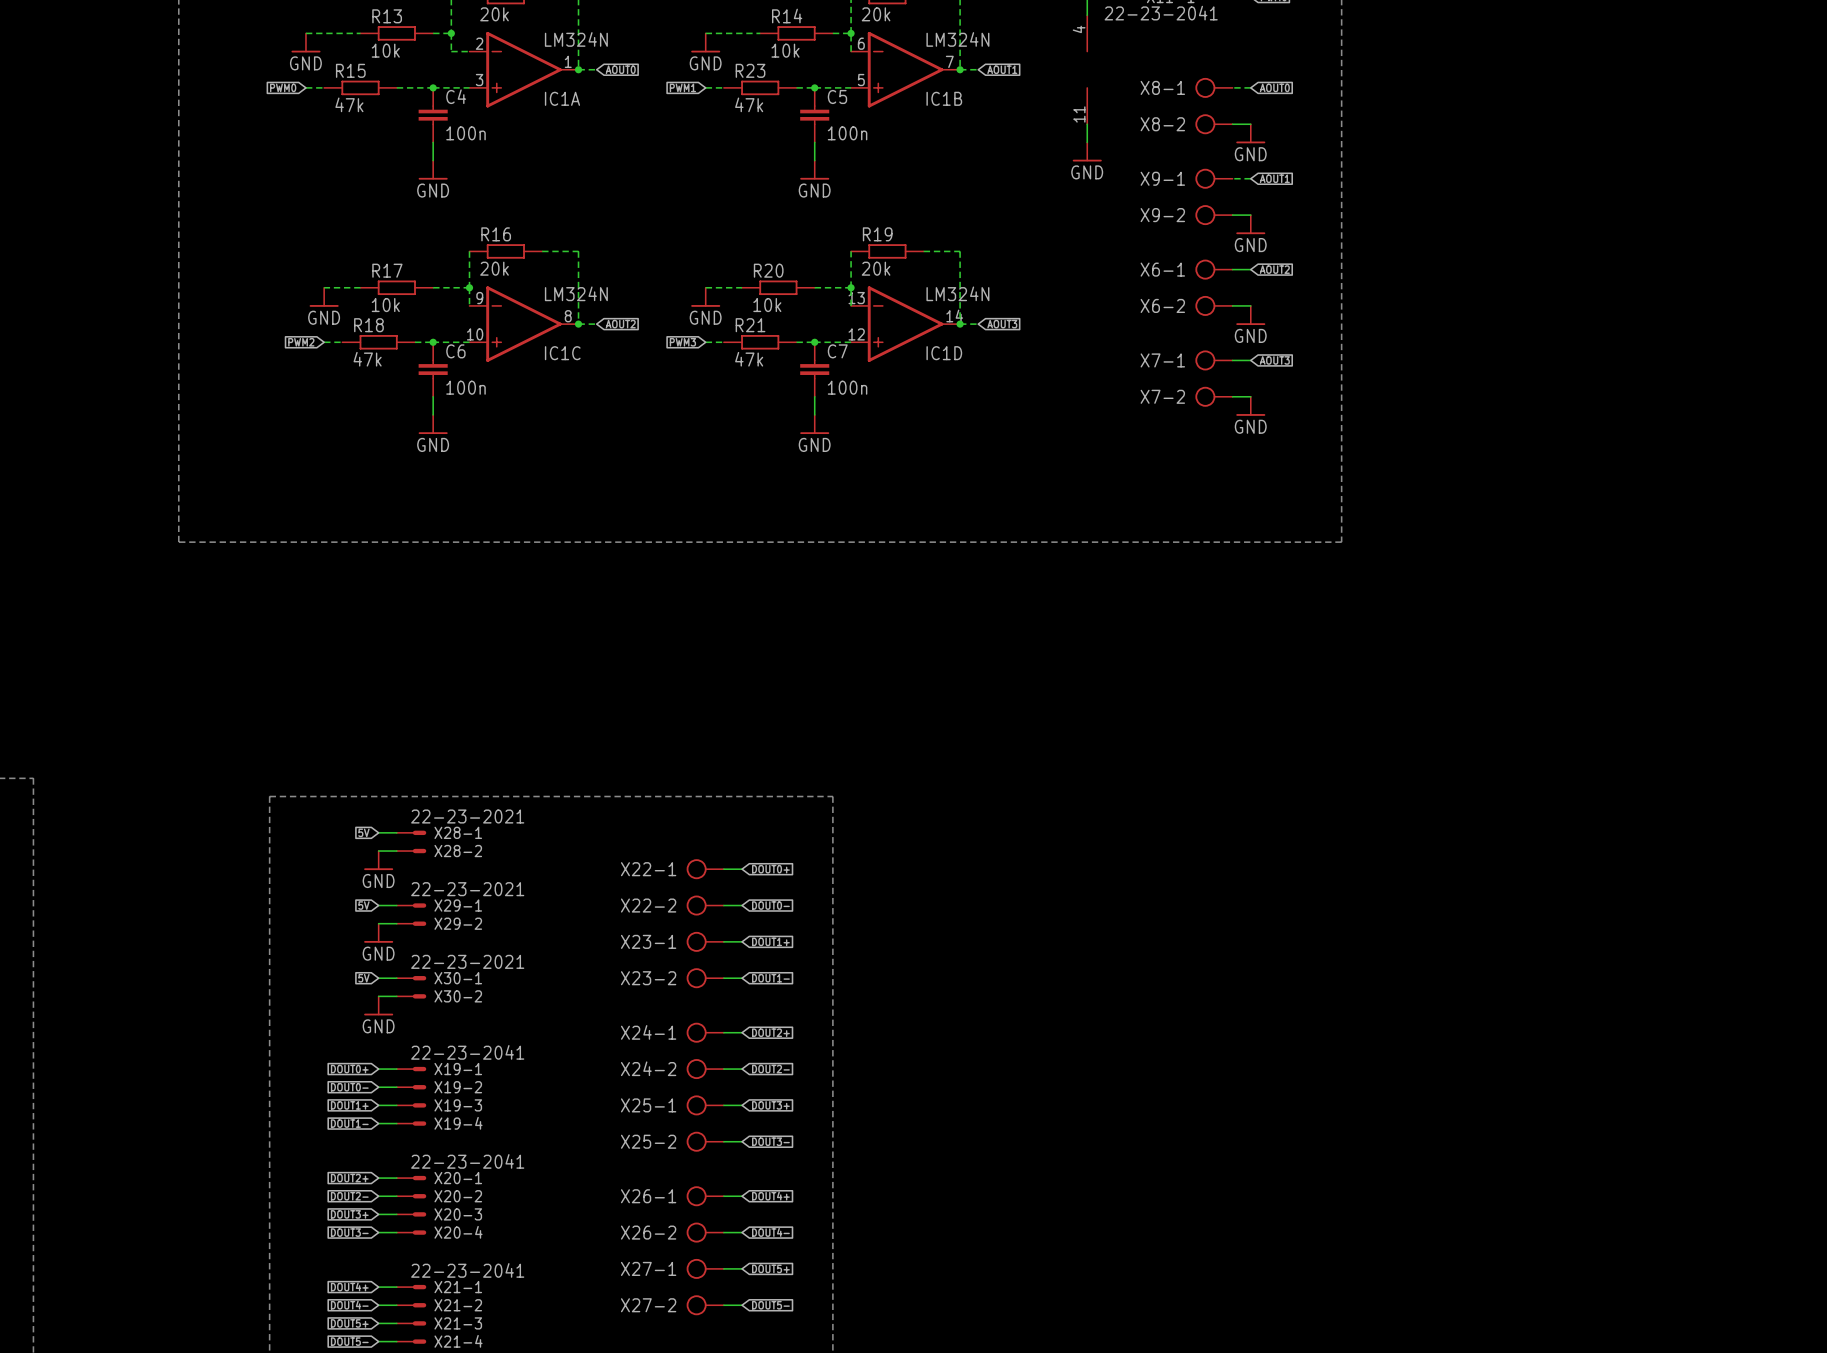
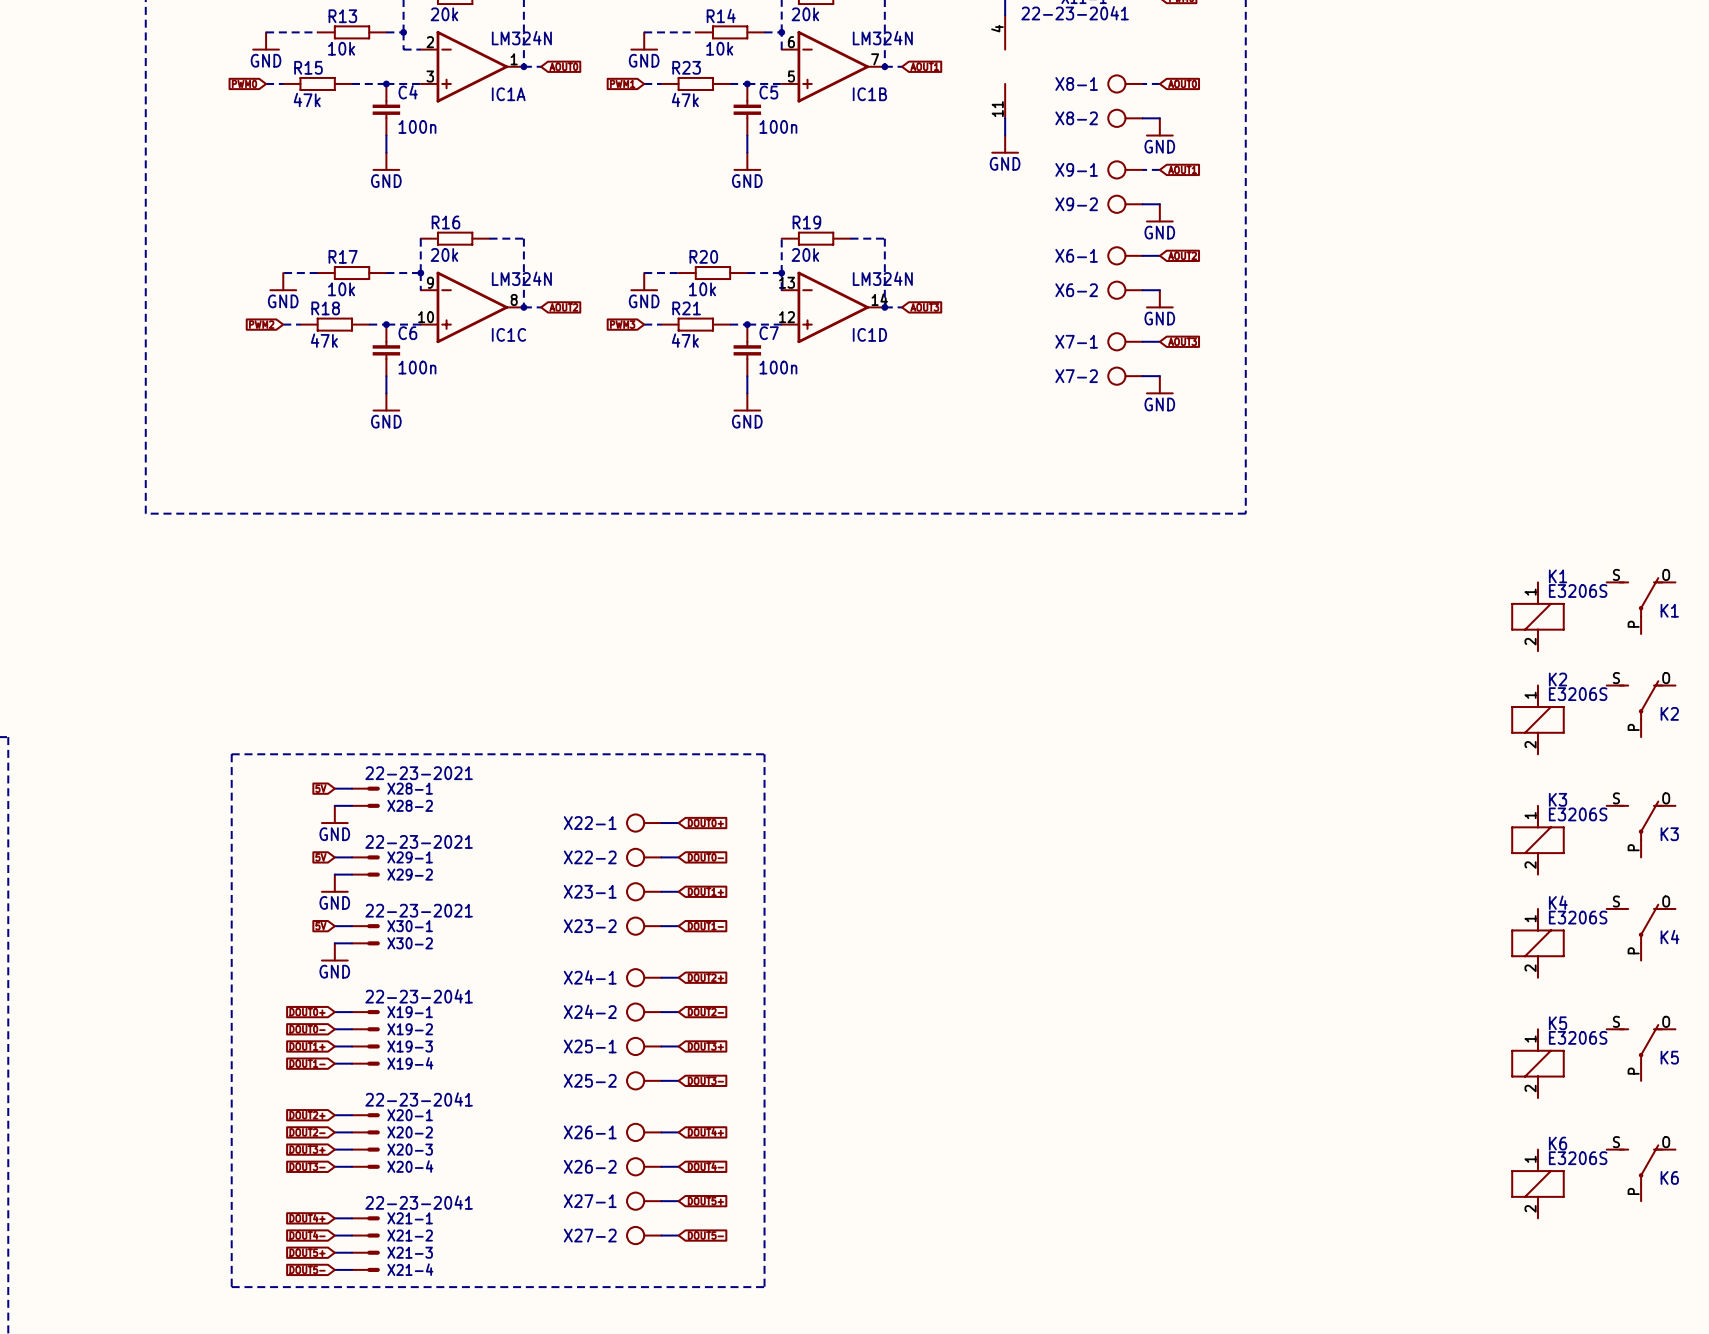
K1: none -> (1641, 605)
K1: none -> E3206S (1537, 616)
K2: none -> (1641, 708)
K2: none -> E3206S (1537, 719)
K3: none -> (1641, 829)
K3: none -> E3206S (1537, 840)
K4: none -> (1641, 932)
K4: none -> E3206S (1537, 943)
K5: none -> (1641, 1052)
K5: none -> E3206S (1537, 1063)
K6: none -> (1641, 1172)
K6: none -> E3206S (1537, 1183)

